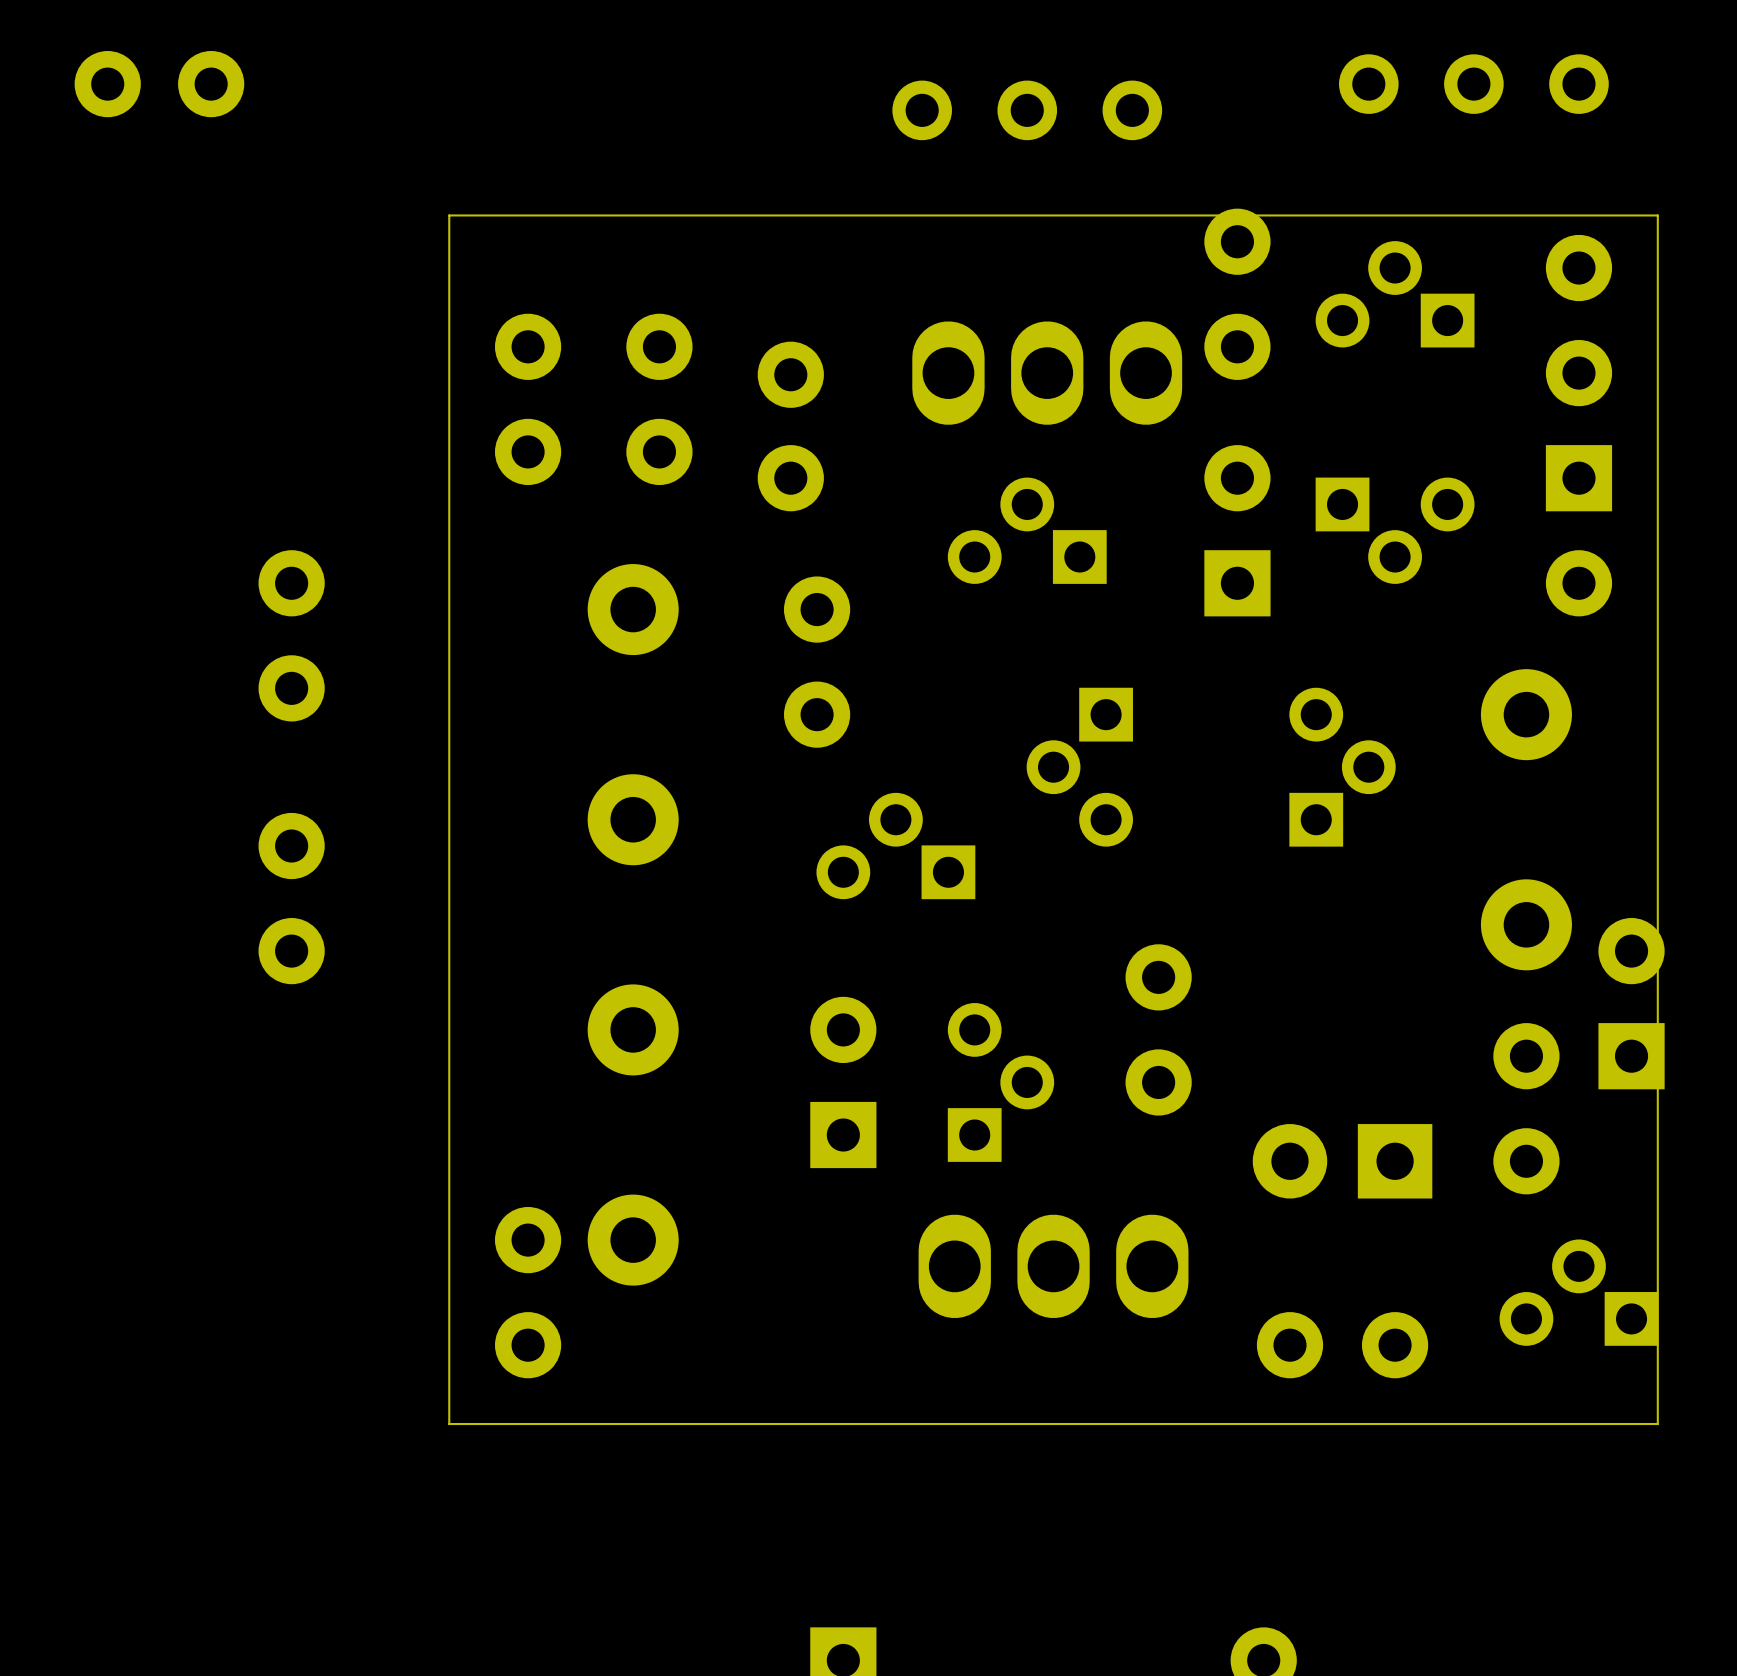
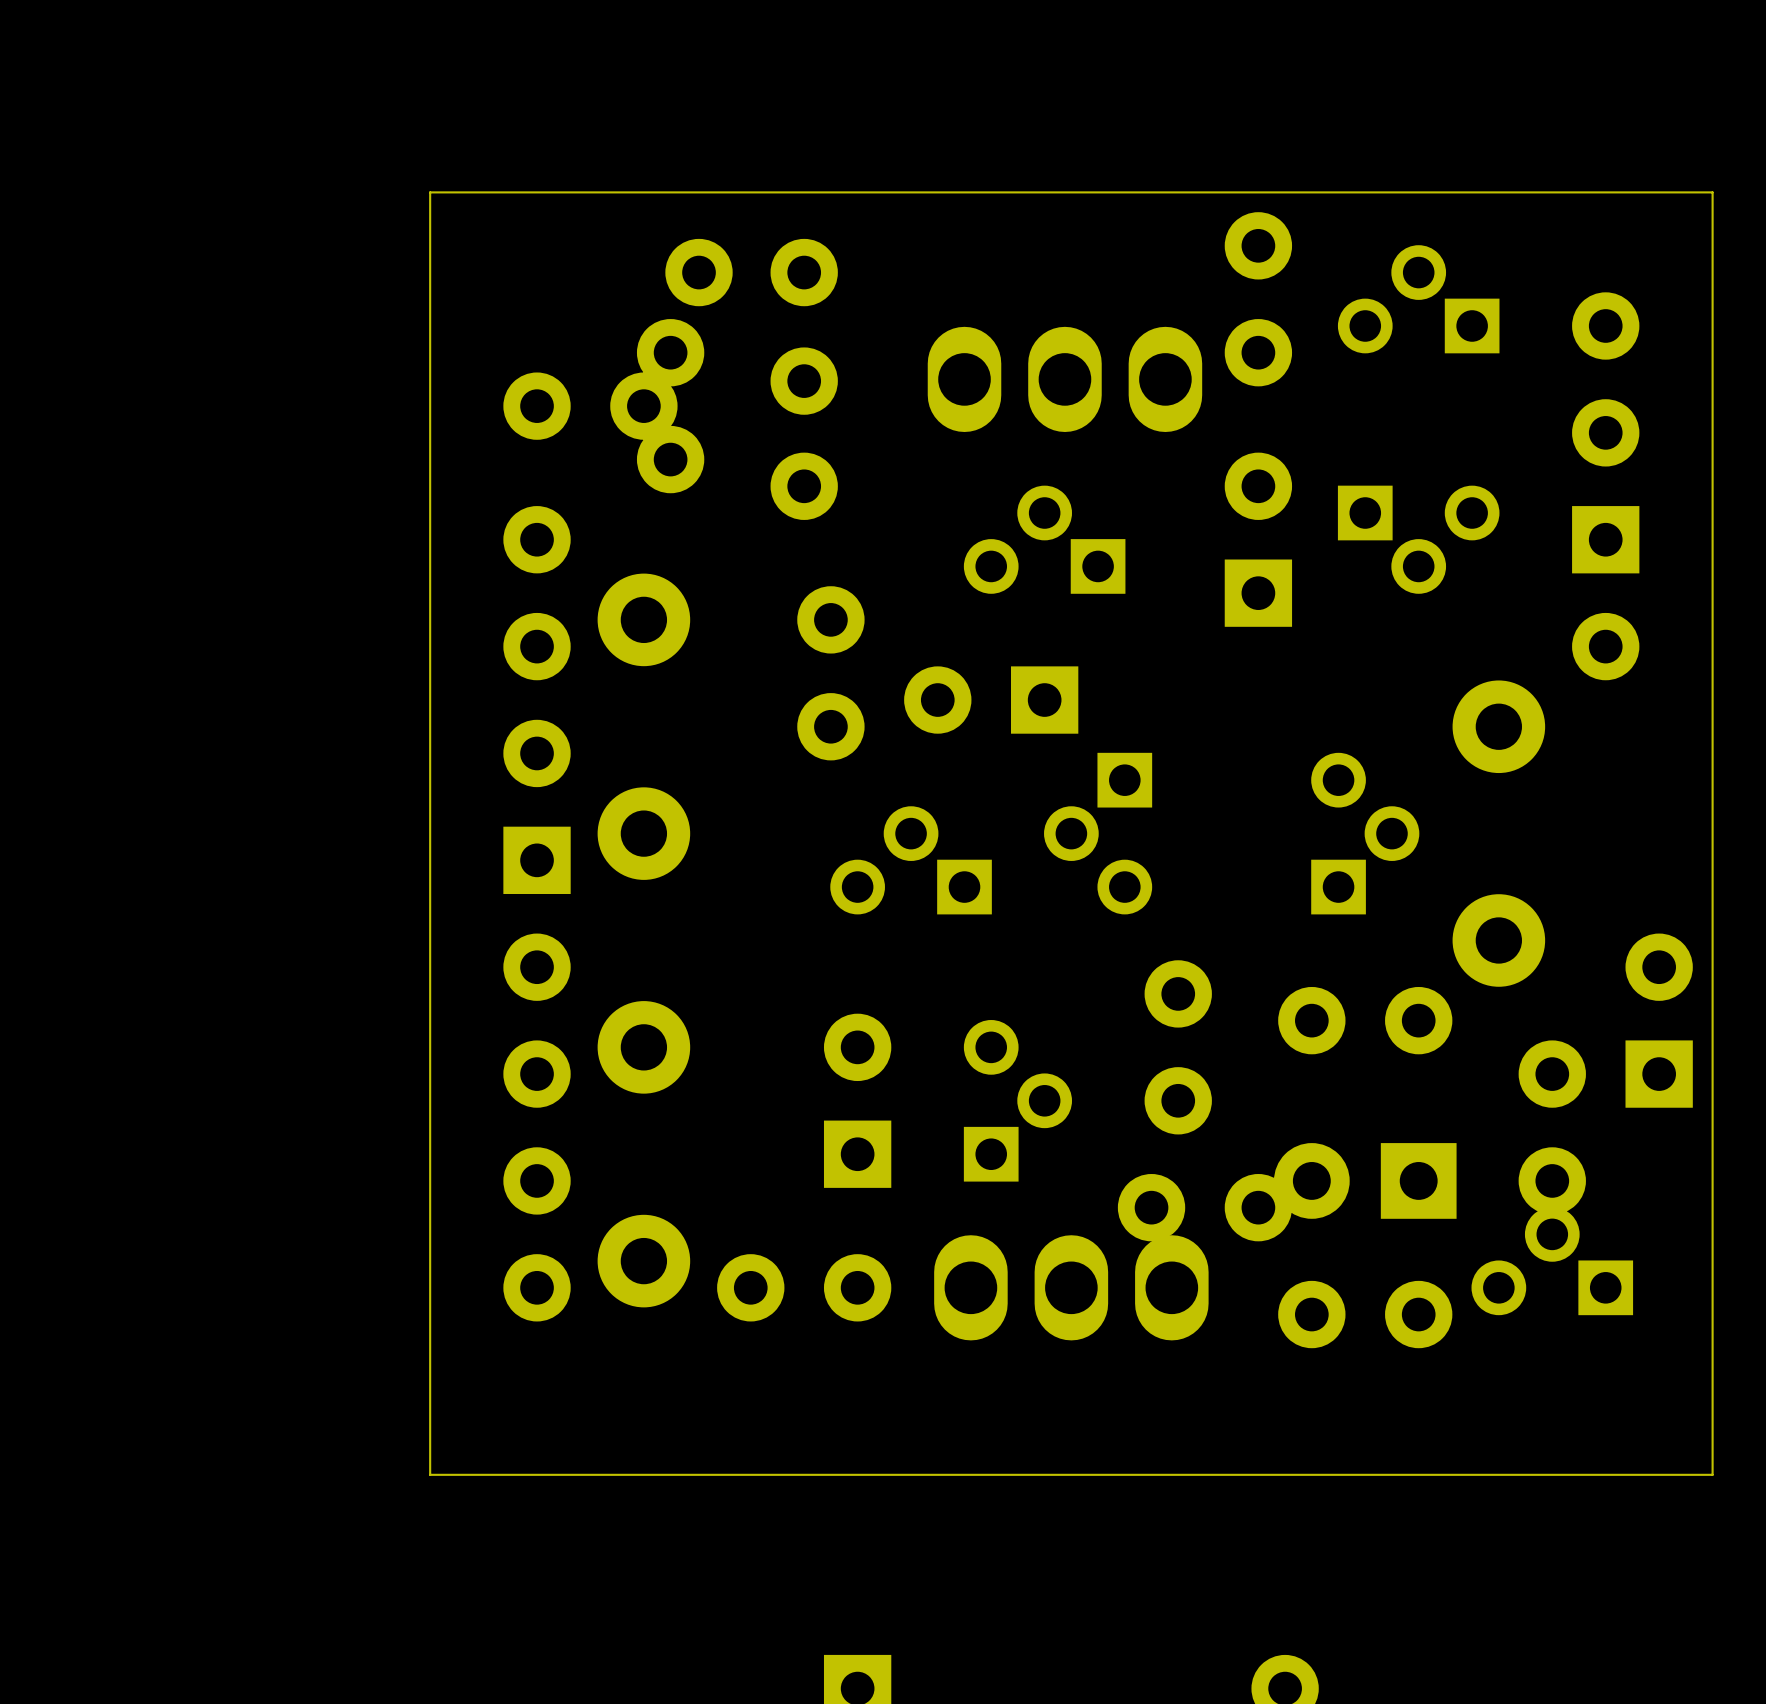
part: (159, 84) -> none
part: (1473, 84) -> none
part: (1027, 110) -> none
board edge: (1657, 215) (449, 215) (449, 1424) (1657, 1424) (1657, 215) -> (1712, 192) (1712, 1474) (430, 1474) (430, 192) (1712, 192)
part: none -> (751, 272)
part position: (1578, 320) -> (1605, 379)
part rotation: 0° (528, 399) -> 90° clockwise (590, 406)
part position: (1578, 530) -> (1605, 593)
part: none -> (537, 593)
part: (291, 635) -> none
part: none -> (991, 700)
part position: (1526, 714) -> (1498, 726)
part position: (1079, 767) -> (1098, 833)
part position: (1342, 767) -> (1365, 833)
part: none -> (537, 806)
part: (291, 898) -> none
part position: (1526, 924) -> (1498, 940)
part: none -> (537, 1020)
part: none -> (1365, 1020)
part: none -> (1204, 1207)
part: none -> (804, 1287)
part position: (528, 1292) -> (537, 1234)
part position: (1578, 1292) -> (1552, 1261)
part position: (1342, 1345) -> (1365, 1314)

